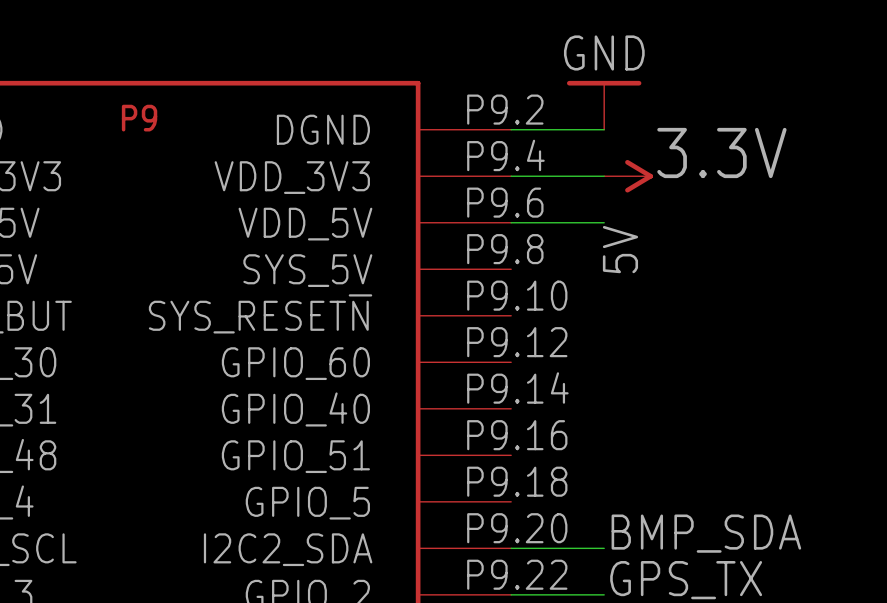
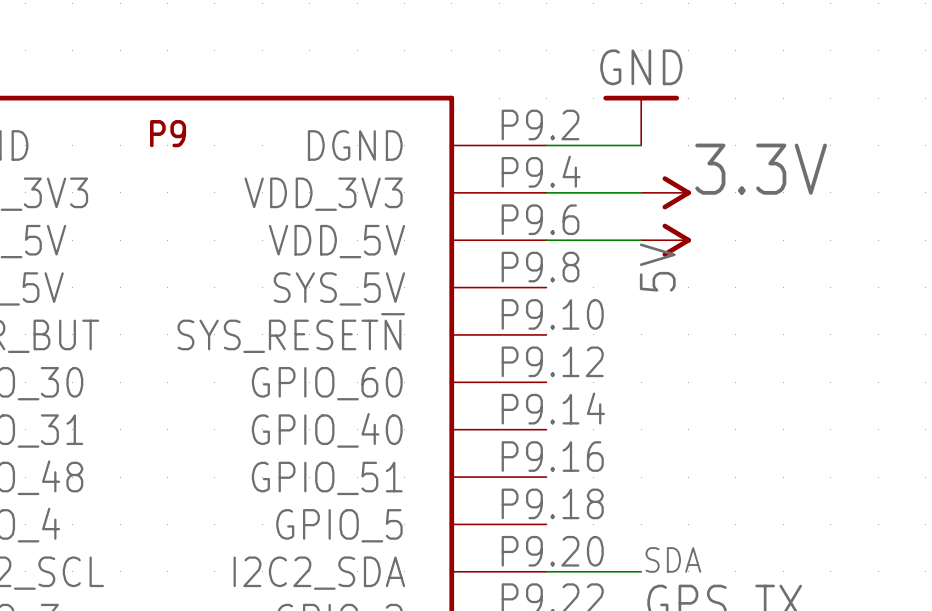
power symbol: none -> (666, 240)
label: BMP_SDA (706, 533) -> SDA (673, 559)

